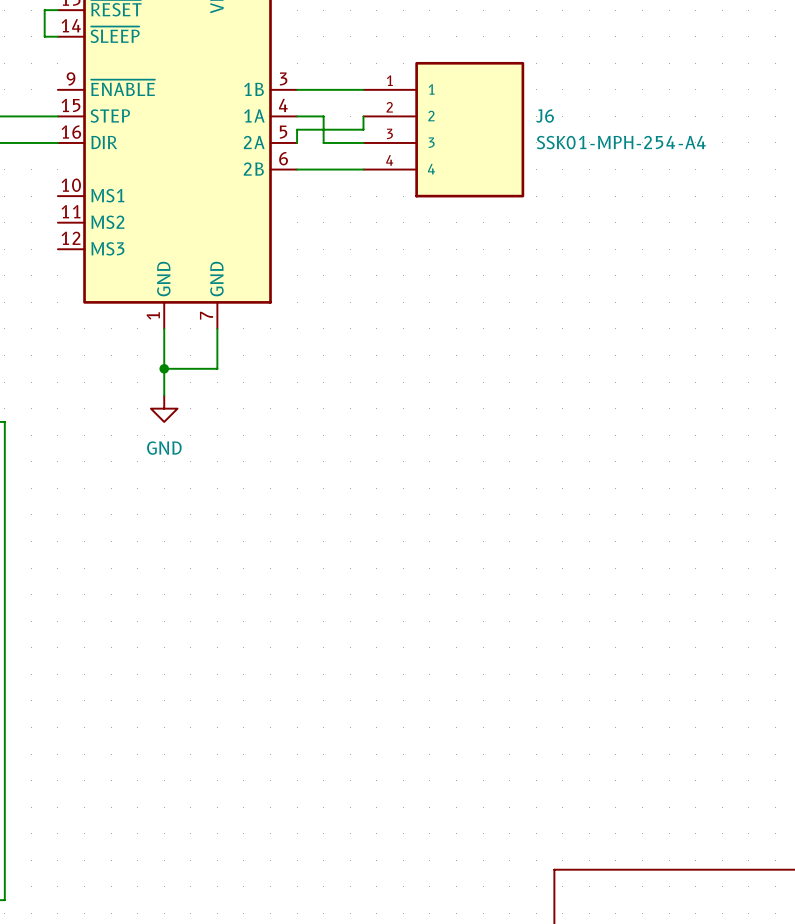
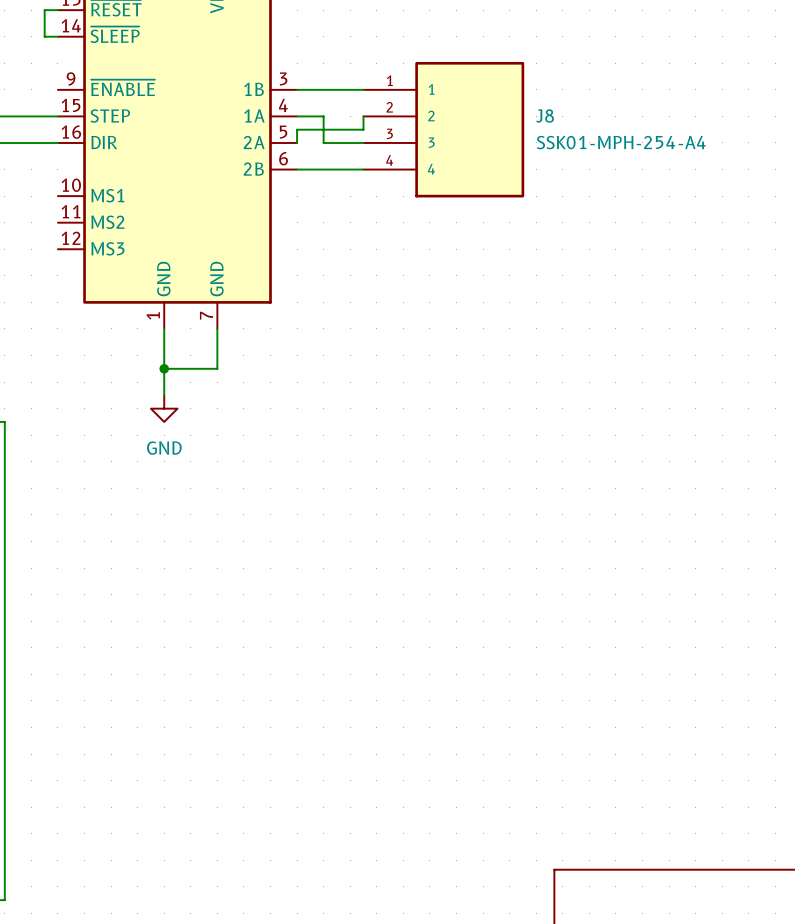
J6 name: J6 (545, 115) -> J8 (545, 115)

